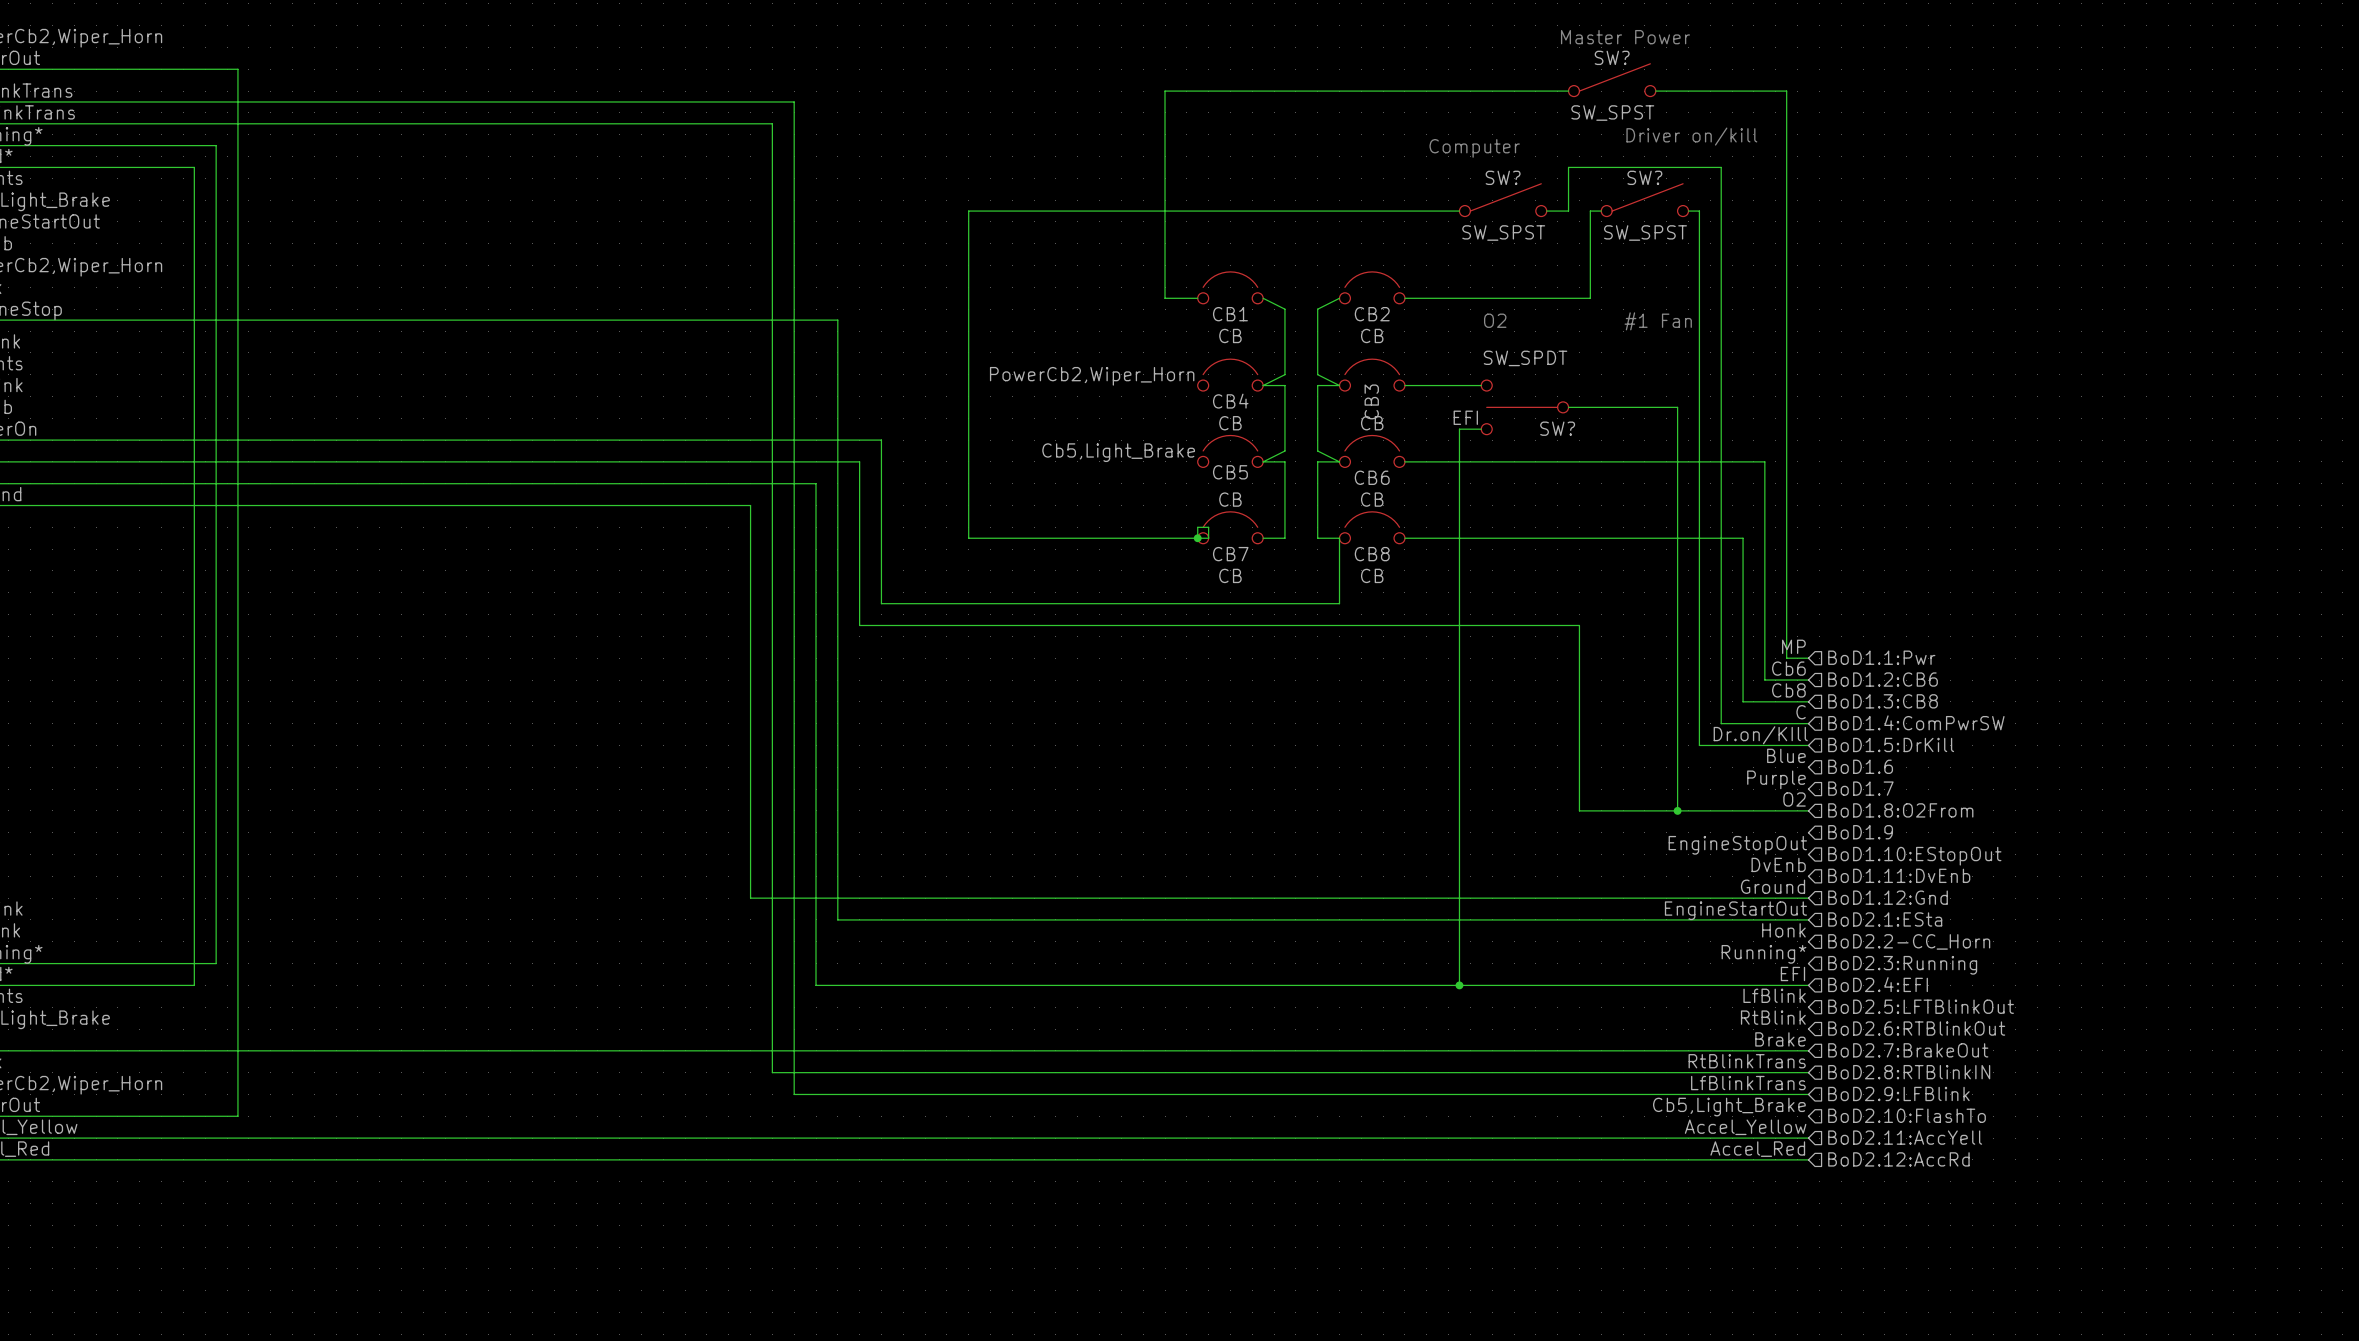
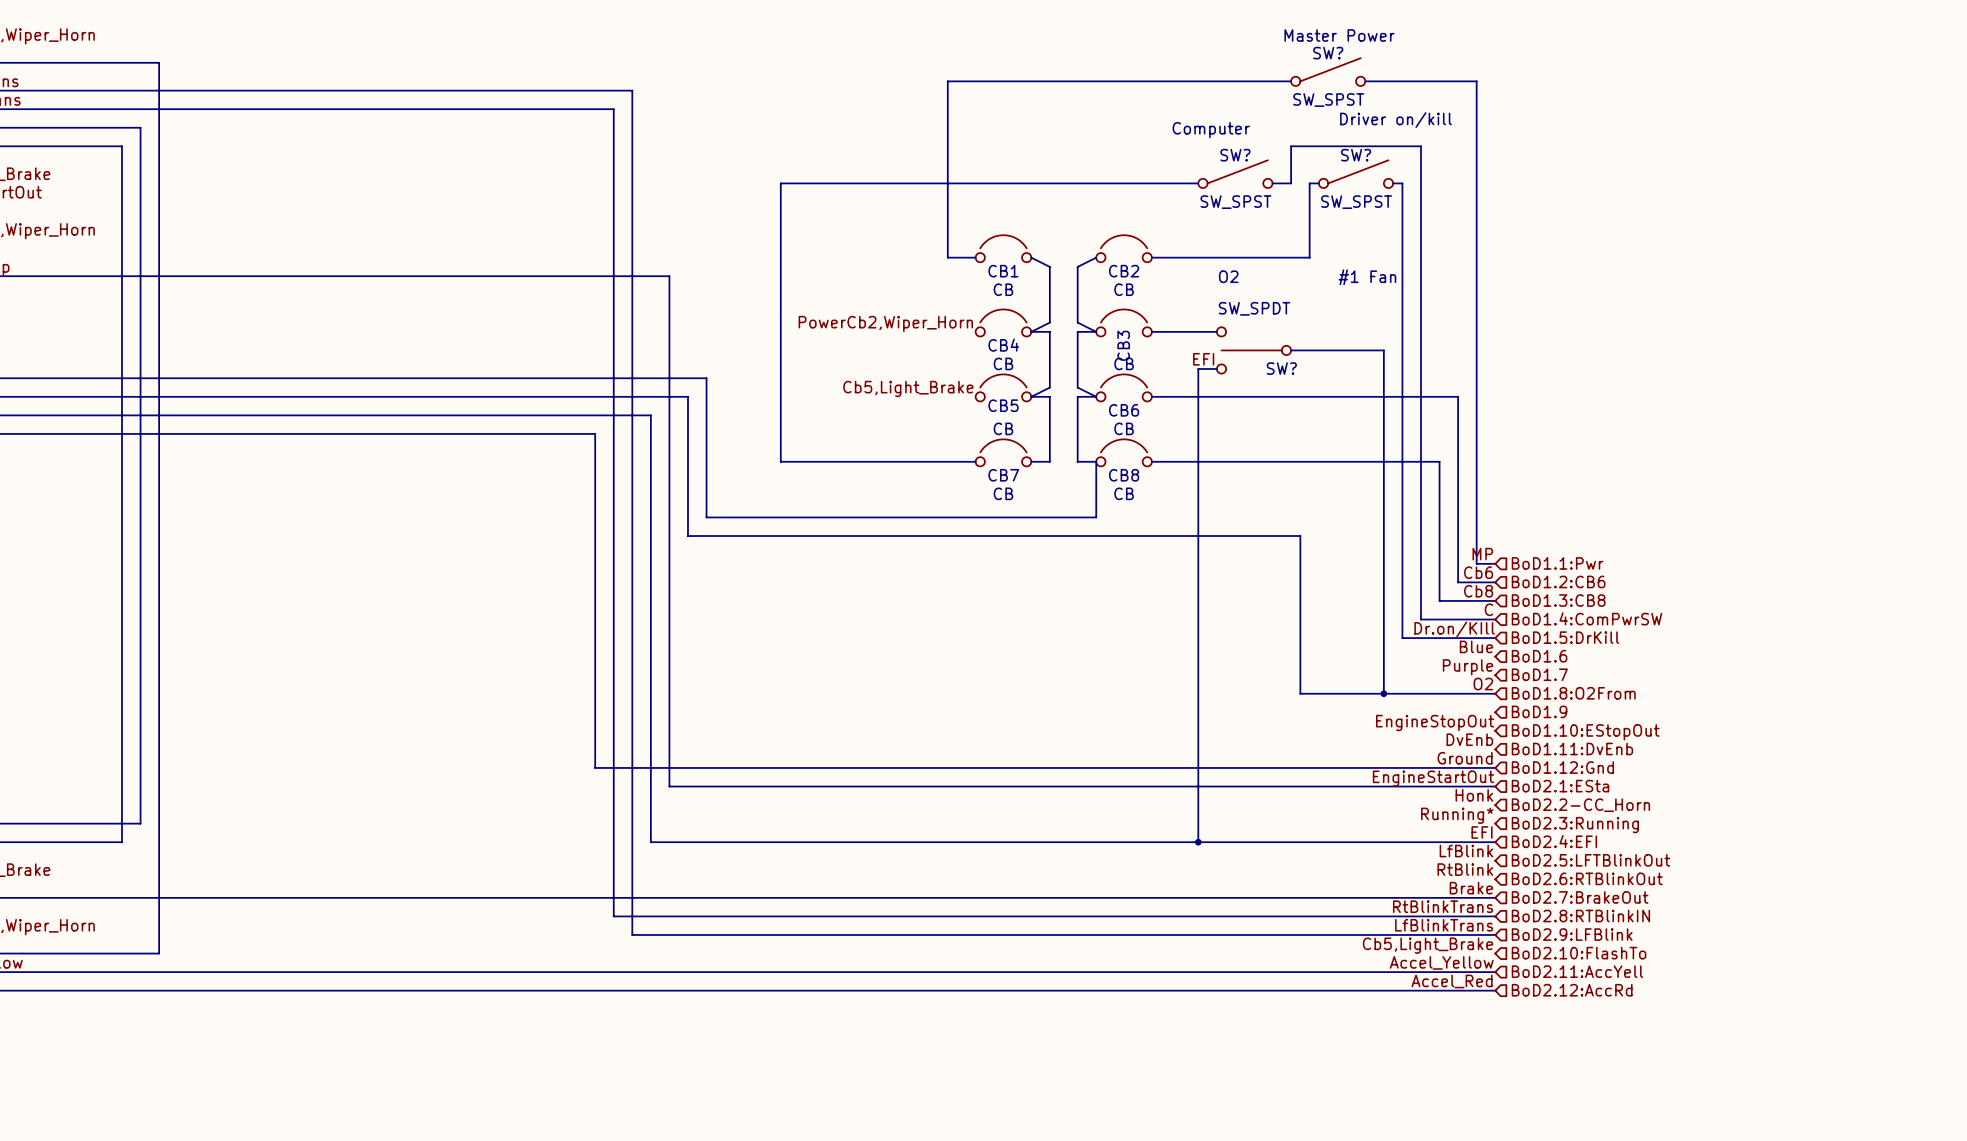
wire: (1197, 527) (1208, 527) (1208, 538) (1197, 538) (1197, 527) -> none
junction: (1197, 538) -> none

